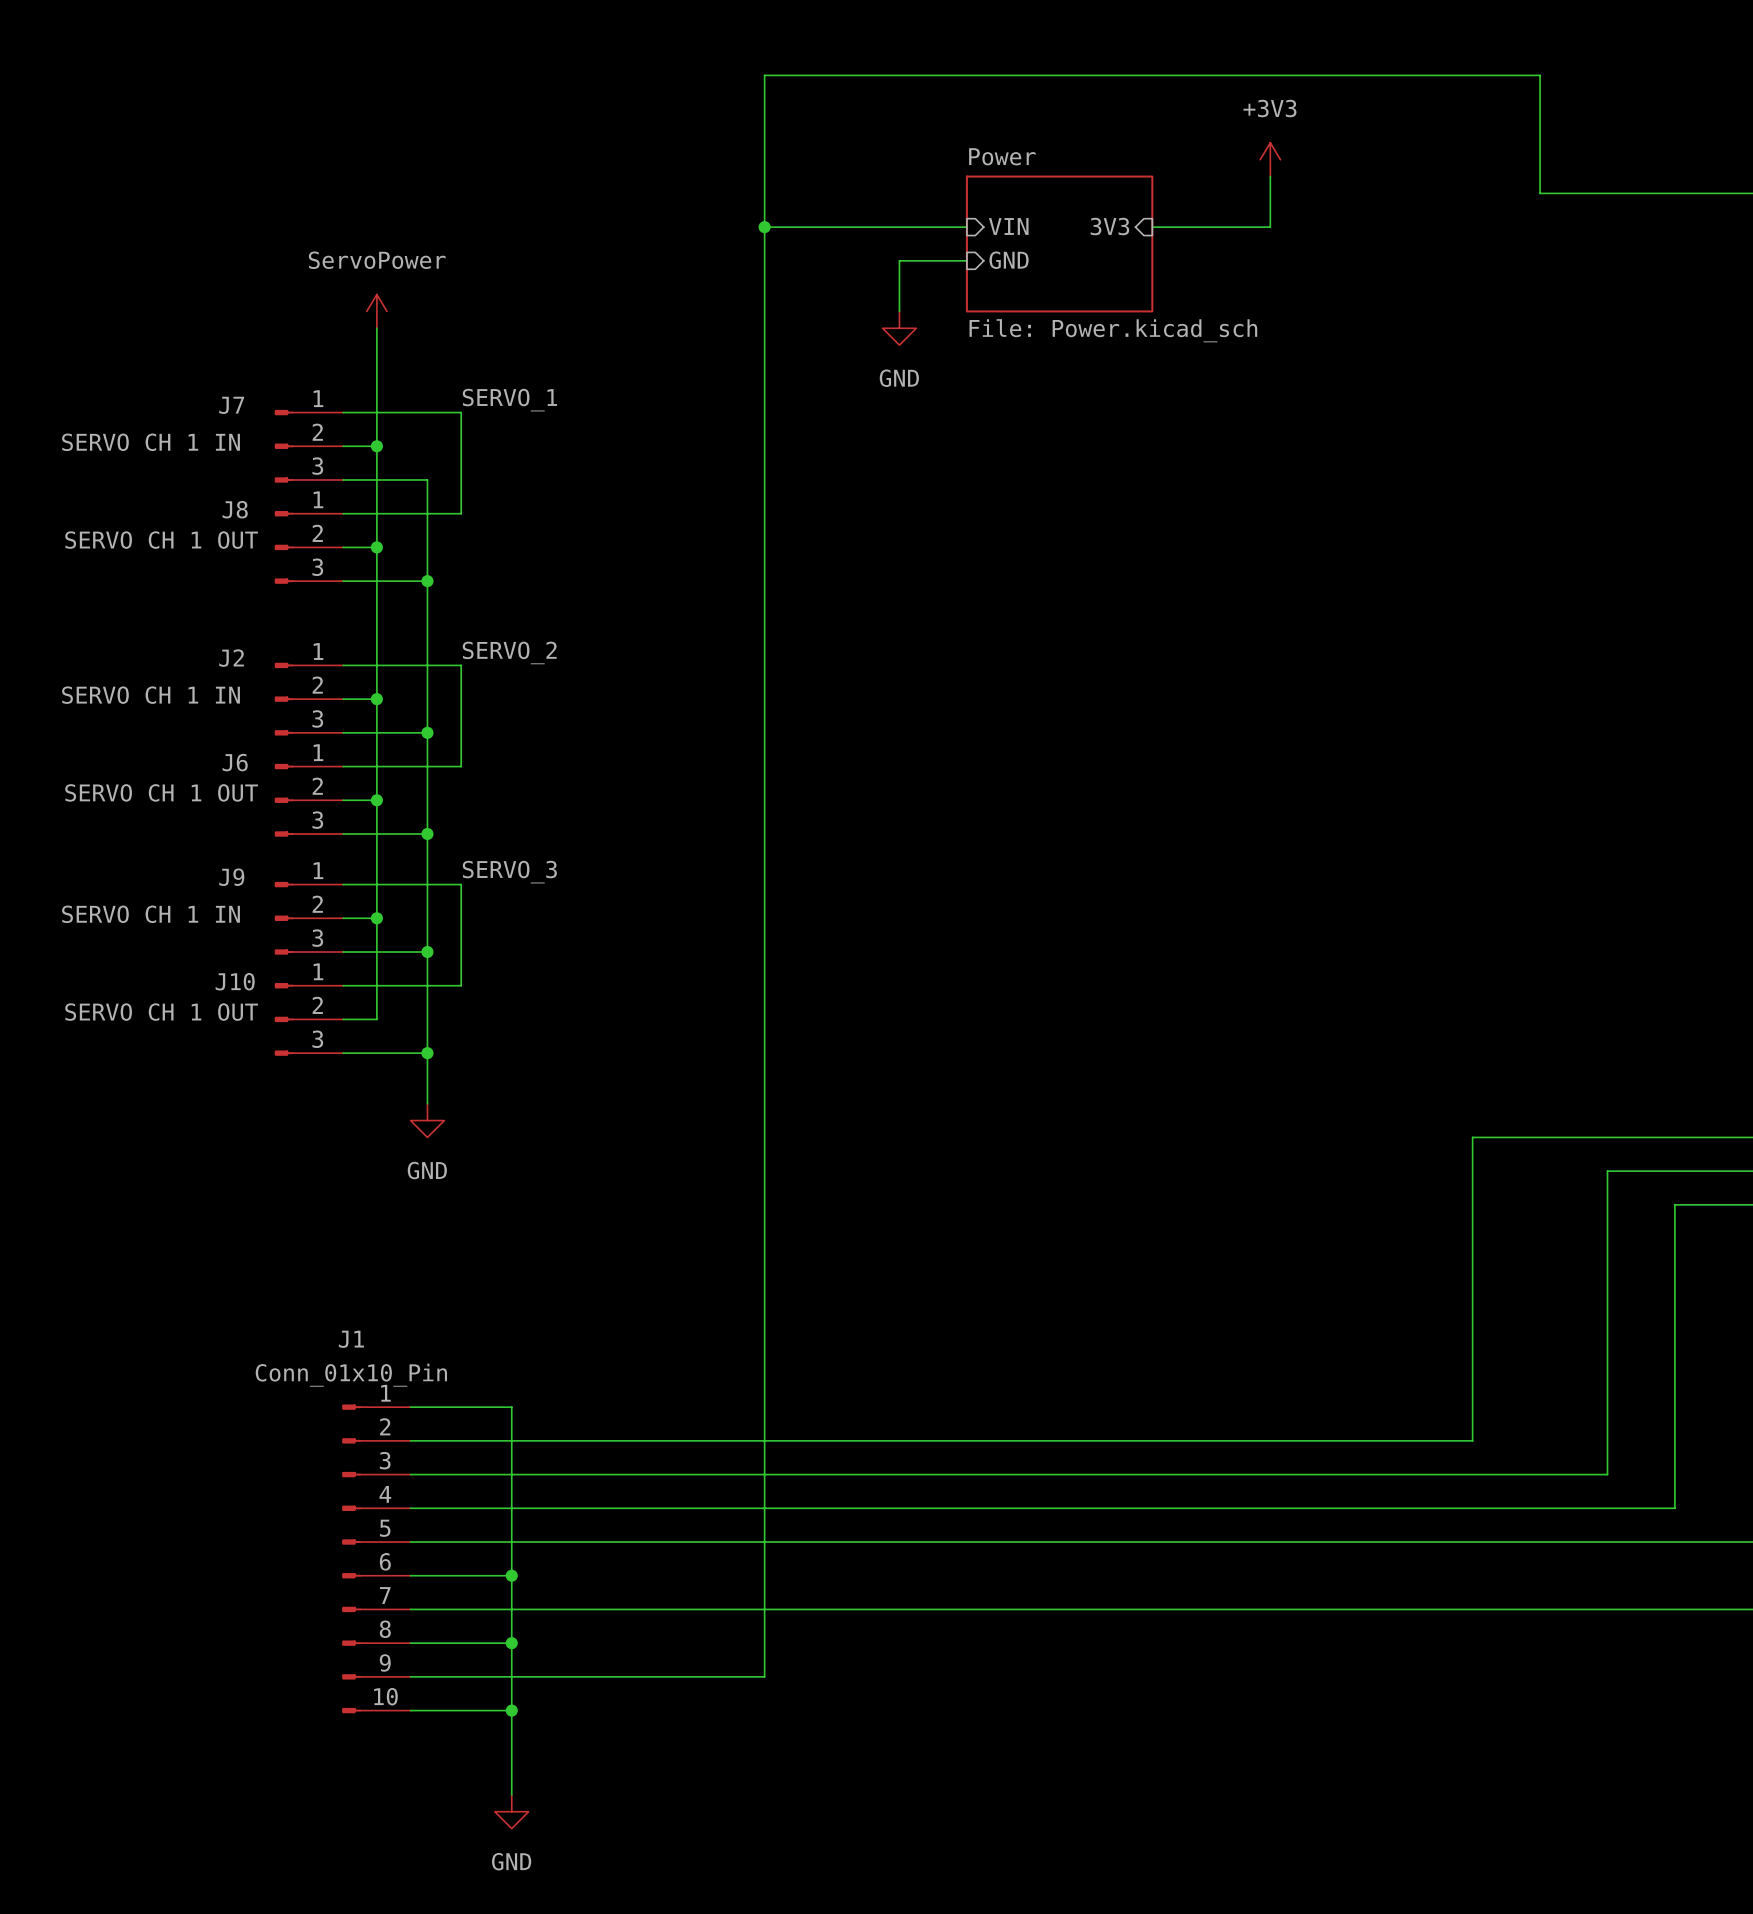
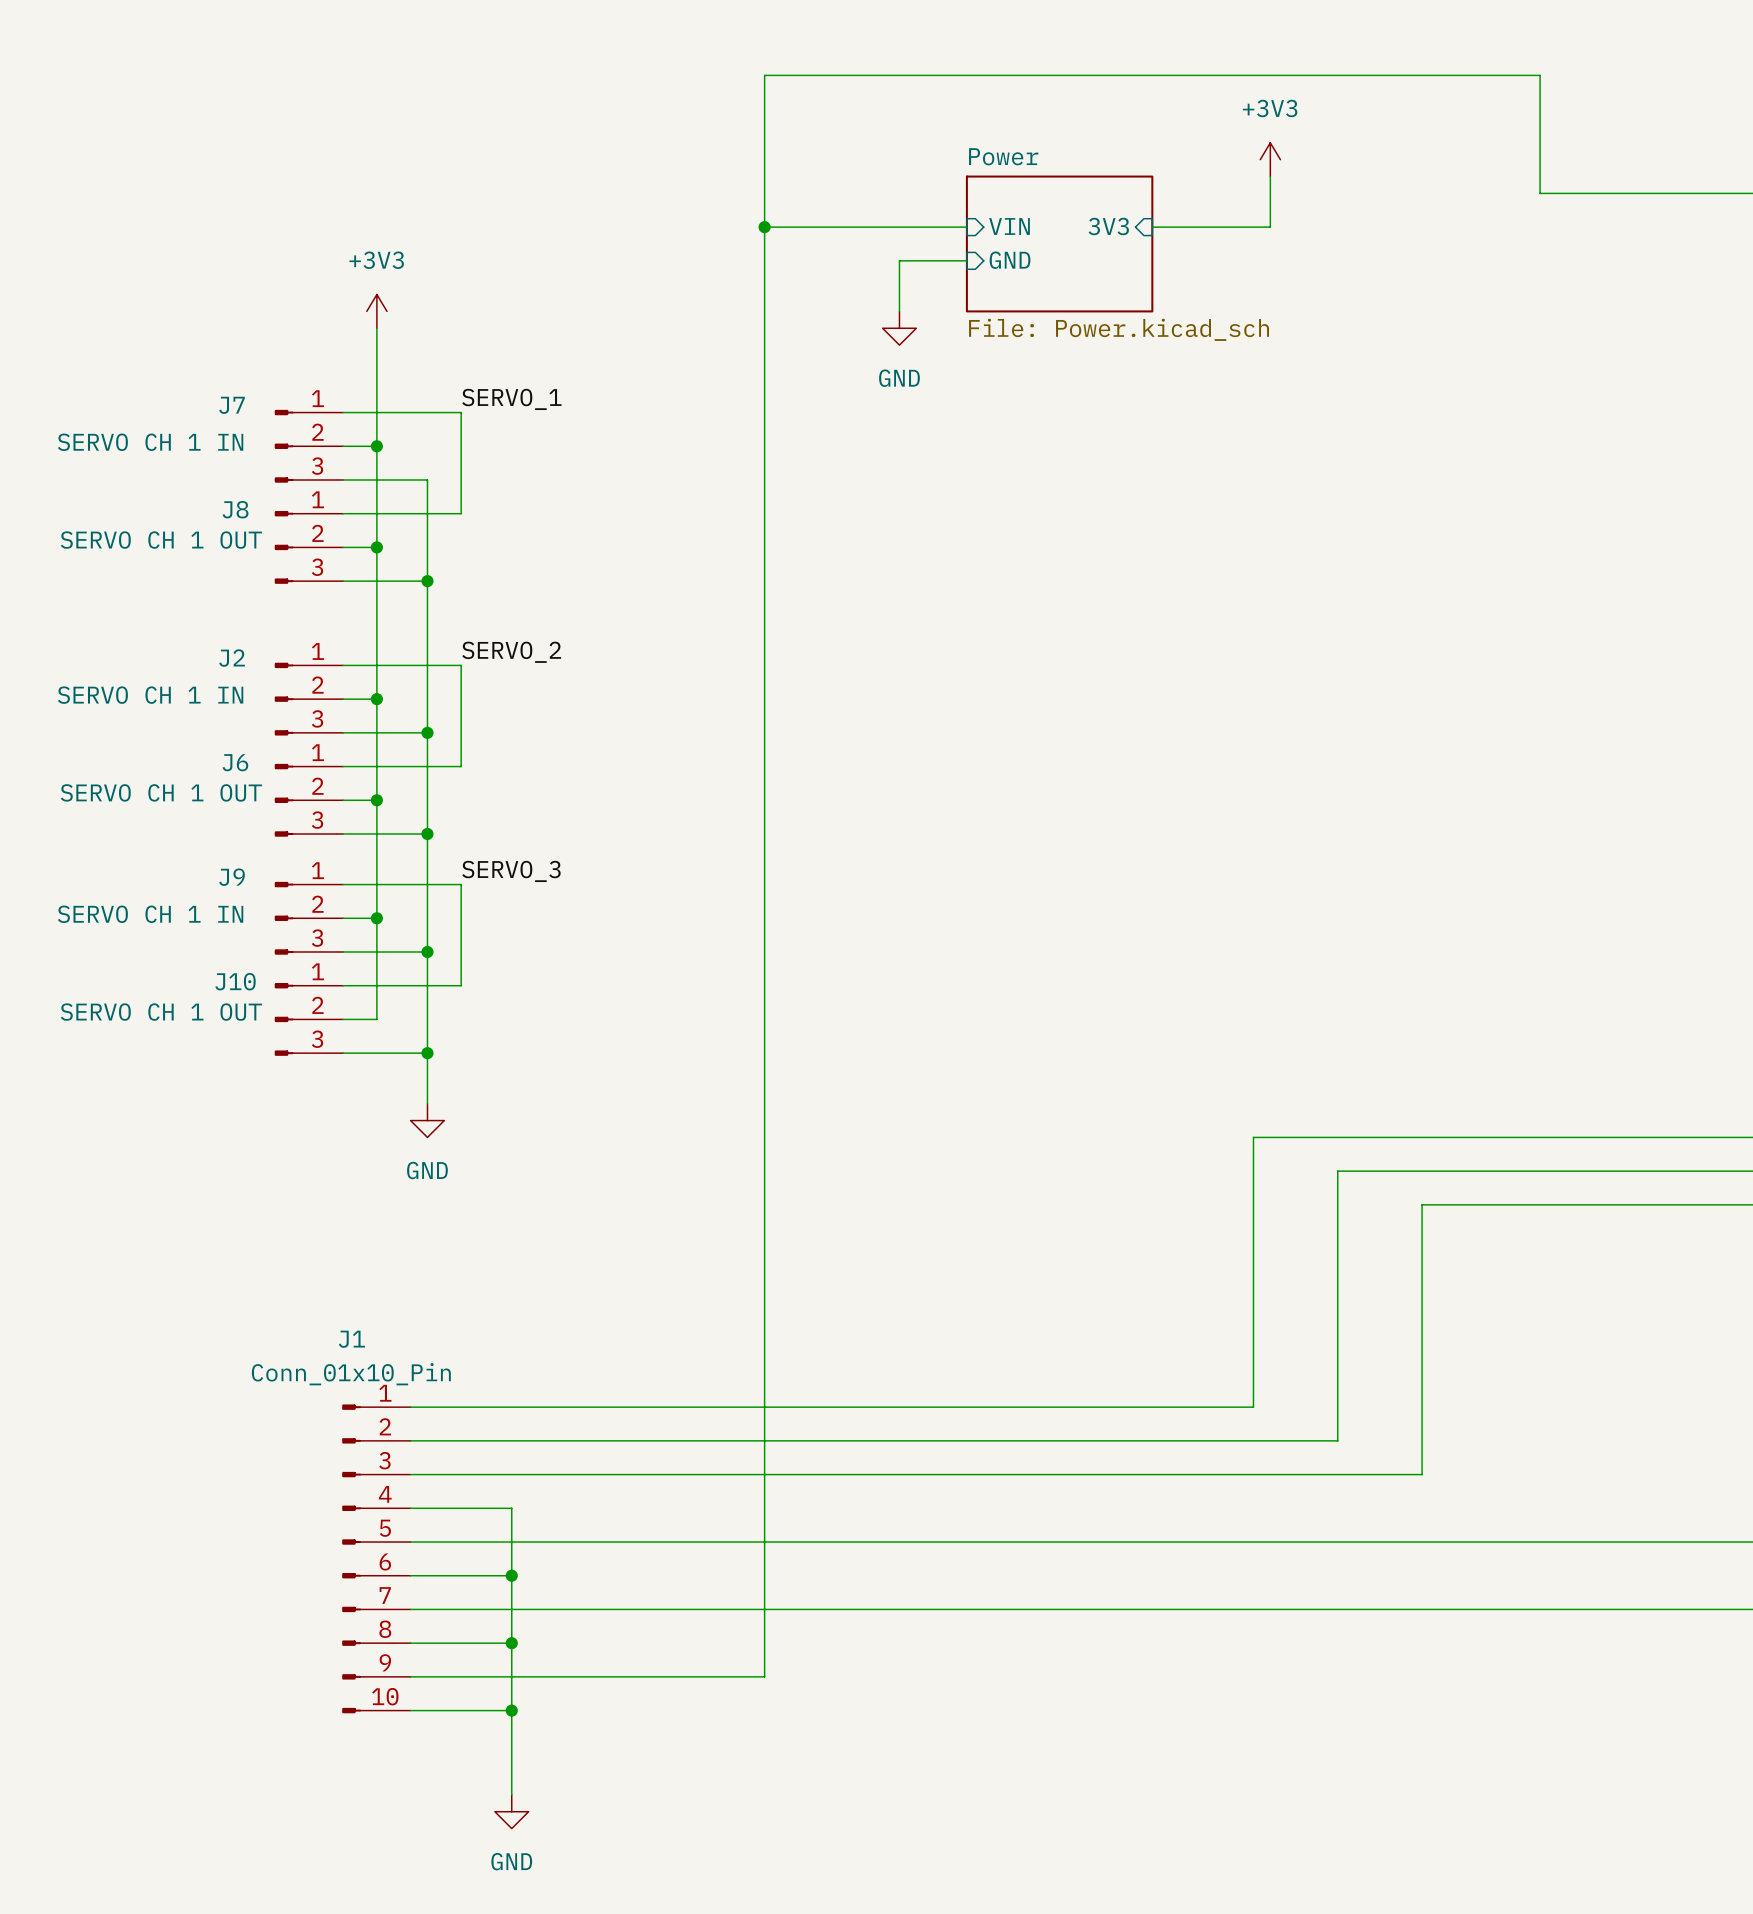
power symbol: ServoPower (376, 311) -> +3V3 (376, 311)
wire: (1472, 1137) (1472, 1440) (1337, 1440) -> (1607, 1171) (1337, 1171) (1337, 1440)
wire: (1607, 1171) (1607, 1474) (1422, 1474) -> (1674, 1204) (1422, 1204) (1422, 1474)
wire: (1674, 1204) (1674, 1508) (511, 1508) (511, 1407) -> (1472, 1137) (1253, 1137) (1253, 1407) (511, 1407)

